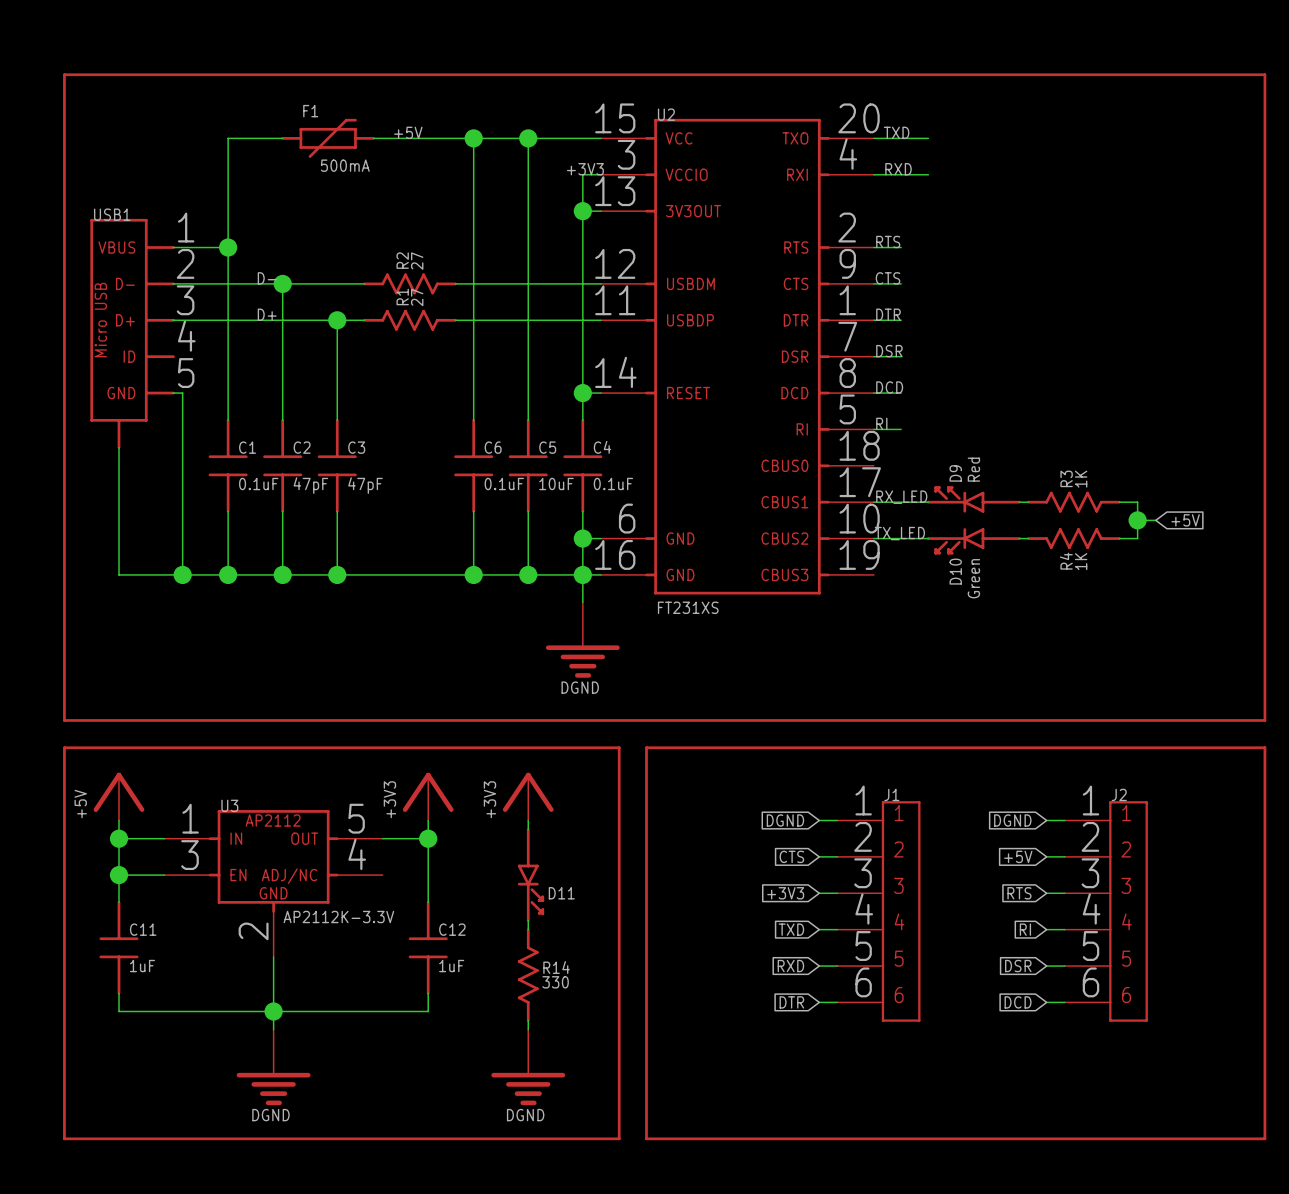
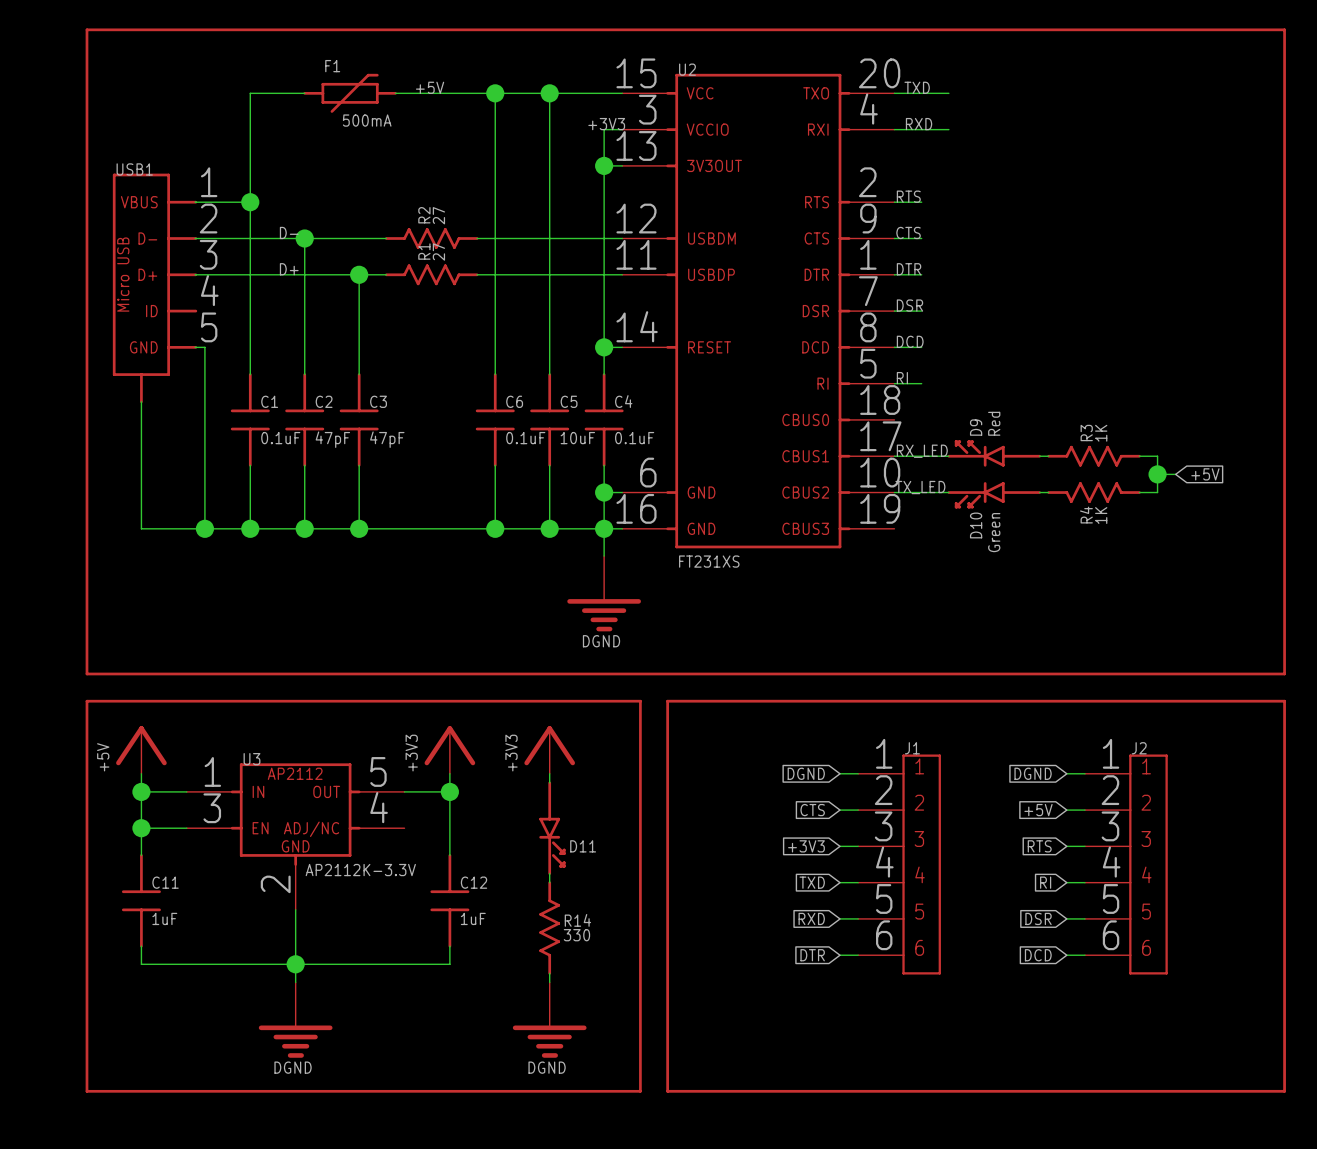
USB1 symbol: [90, 218, 175, 449] -> [112, 173, 198, 404]

